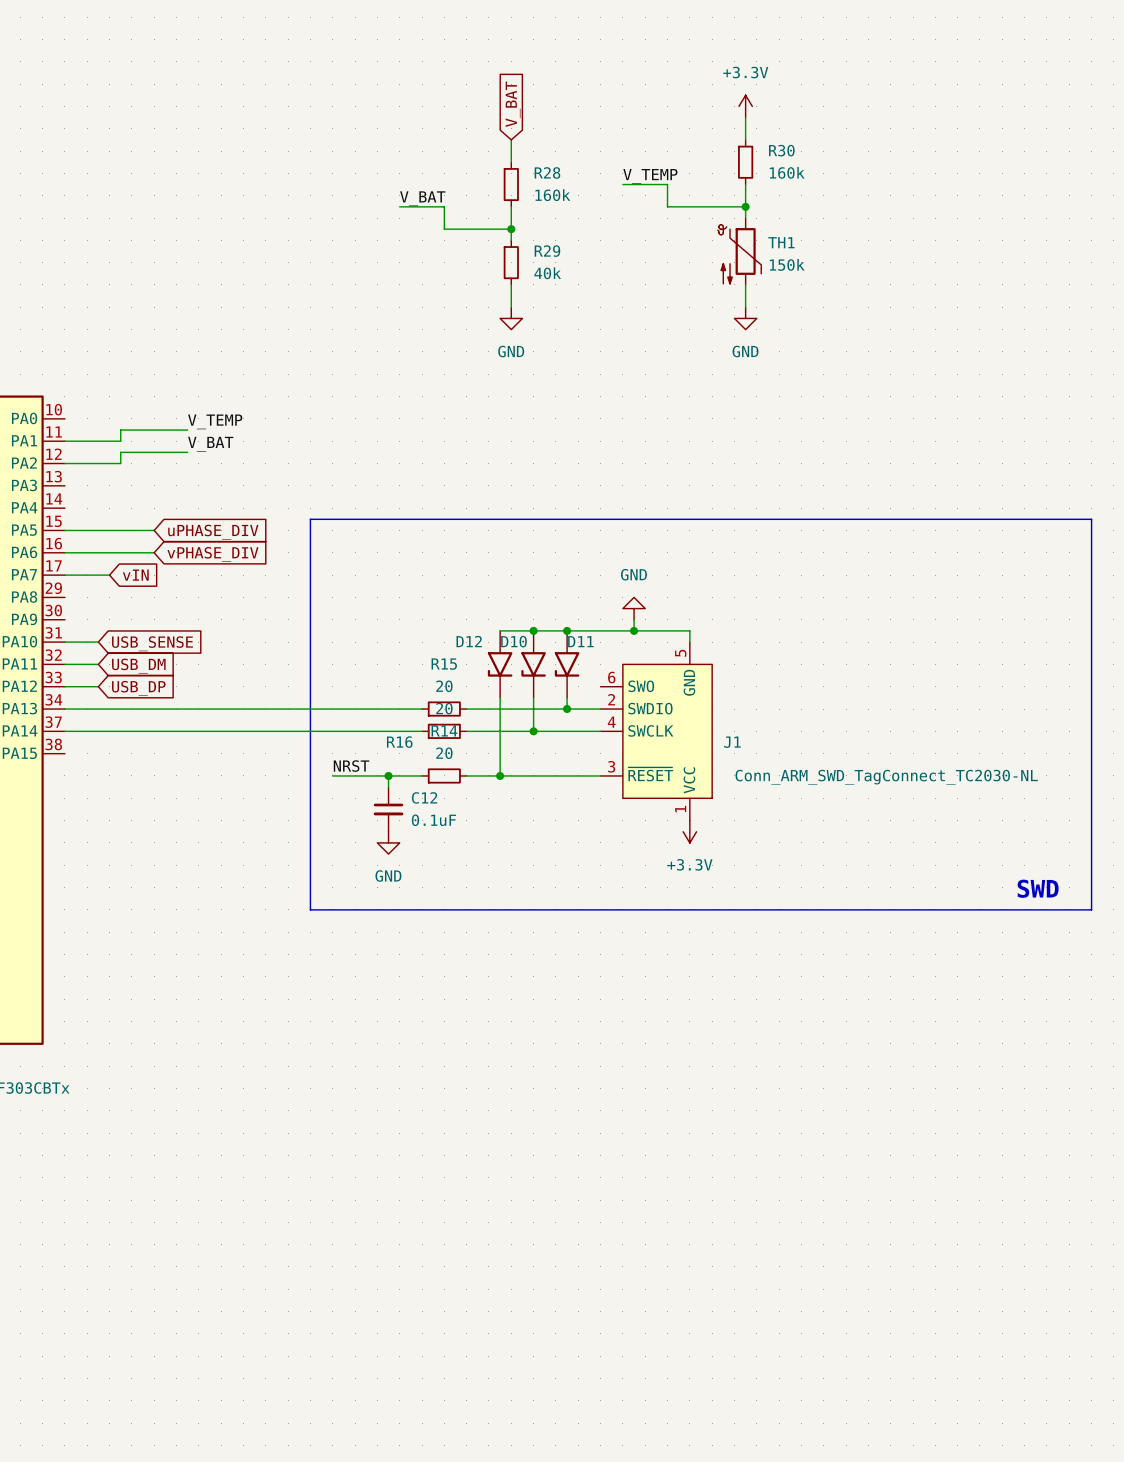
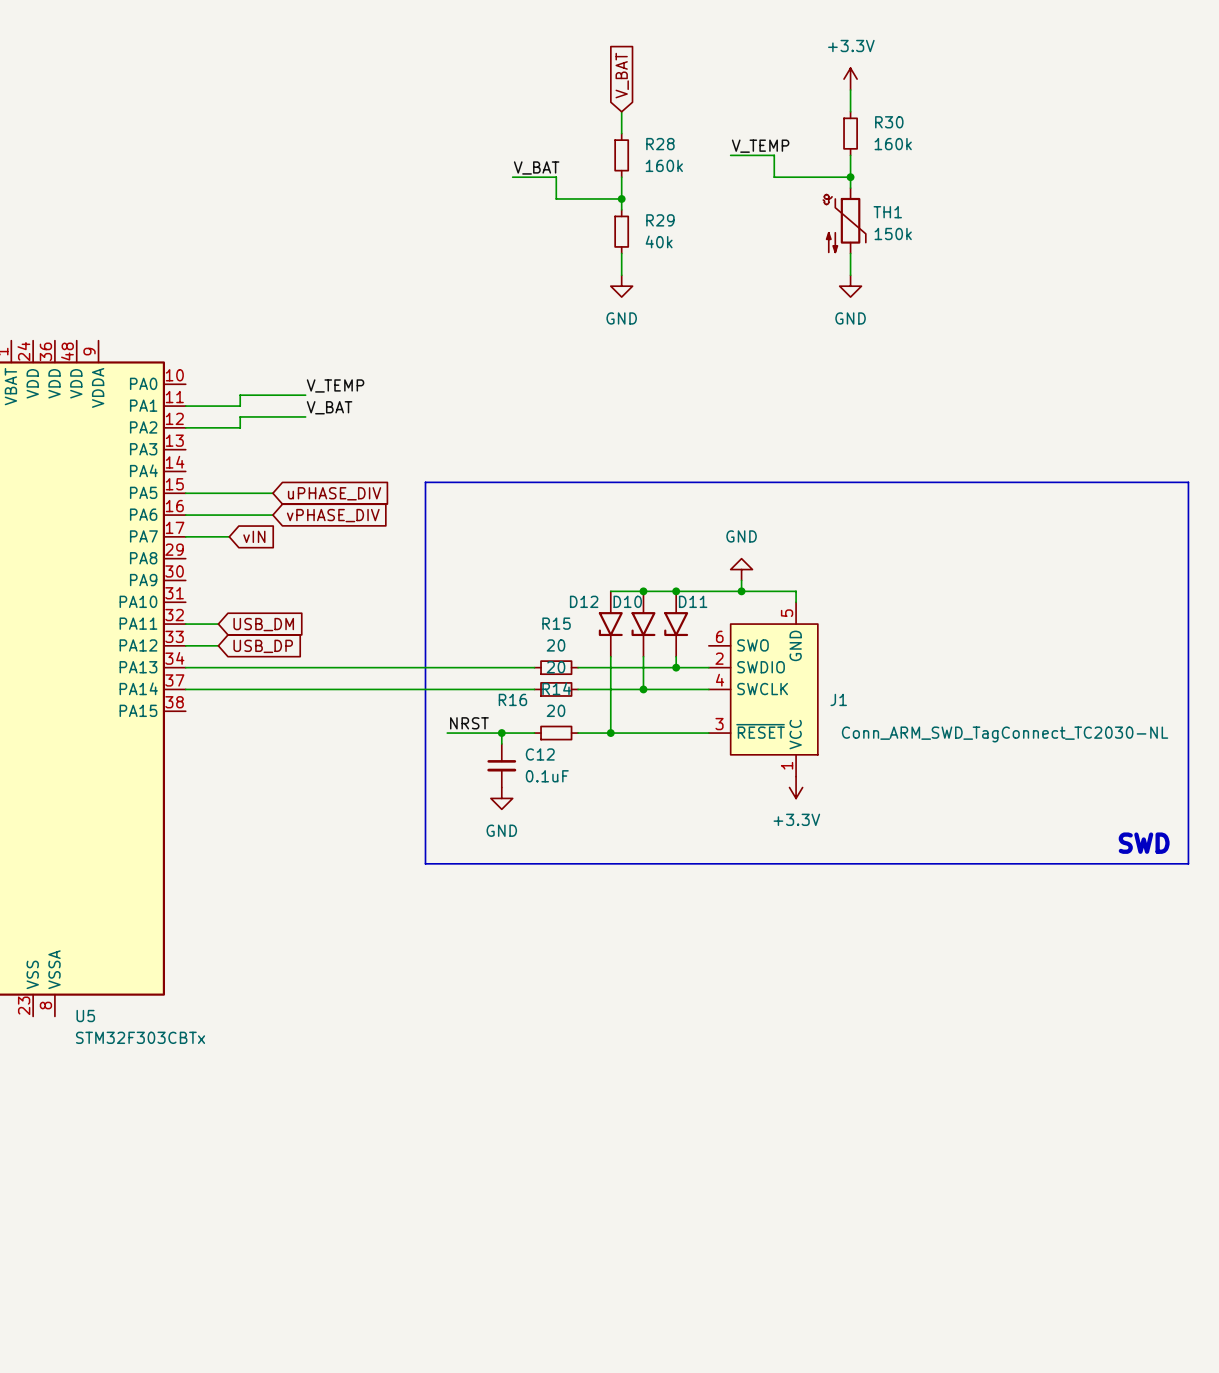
wire: (64, 642) (98, 642) -> none
global label: USB_SENSE (152, 643) -> none

